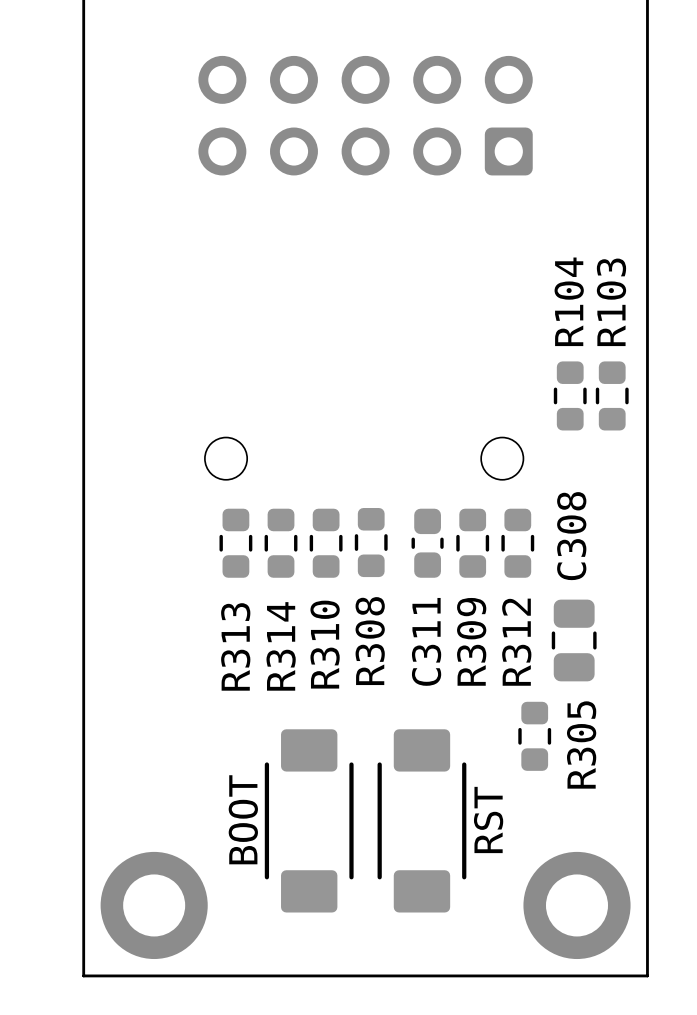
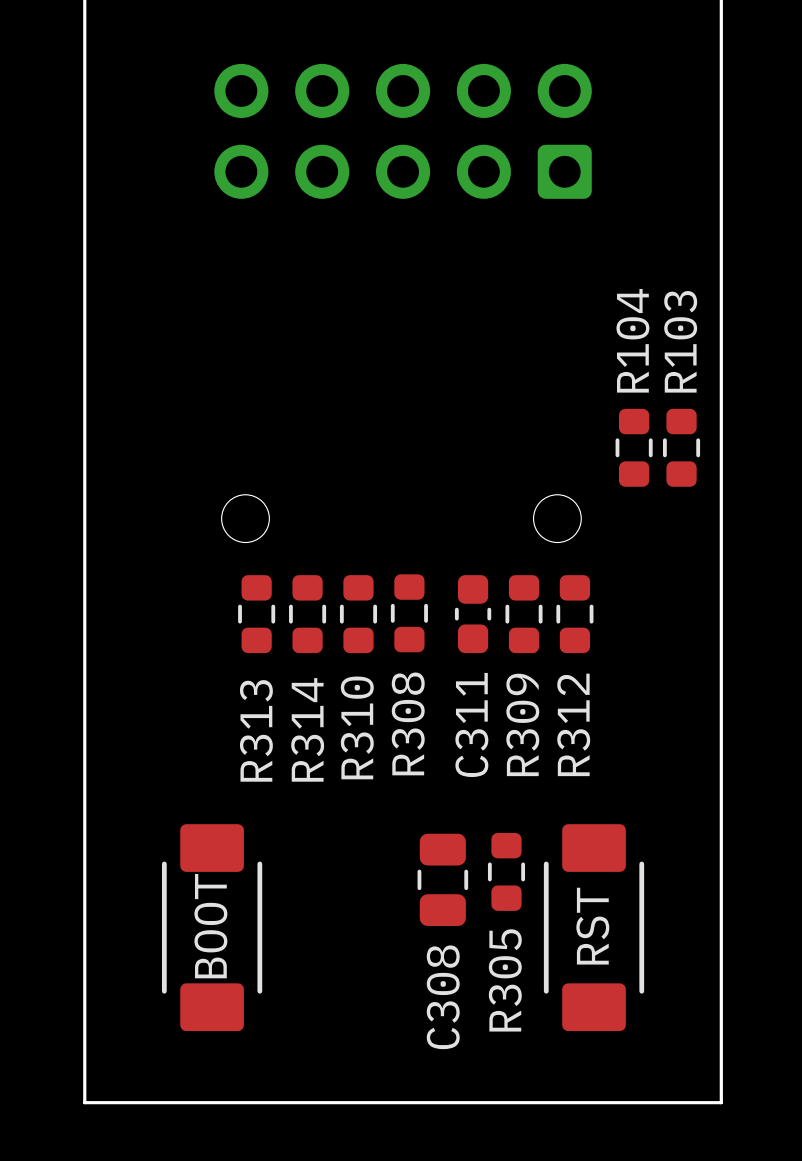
C308 name position: C308 (571, 536) -> C308 (443, 997)
C308 position: (574, 640) -> (442, 879)
R305 position: (534, 736) -> (506, 871)
R305 name position: R305 (581, 744) -> R305 (505, 980)
part value position: BOOT (243, 819) -> BOOT (210, 926)
part value position: RST (488, 819) -> RST (592, 926)
part position: (309, 820) -> (212, 927)
part position: (421, 820) -> (594, 927)
part: (154, 905) -> none
part: (577, 905) -> none

